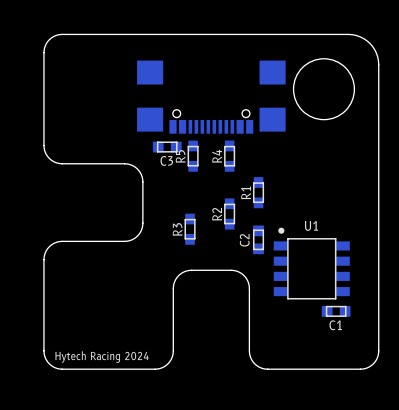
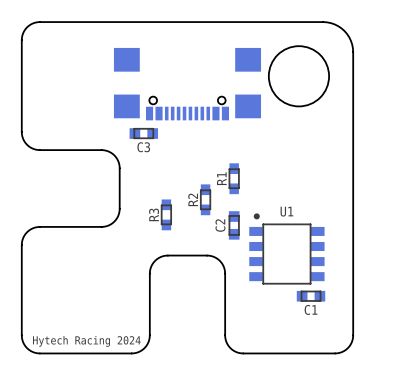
R5: (193, 156) -> none
R4: (229, 156) -> none

